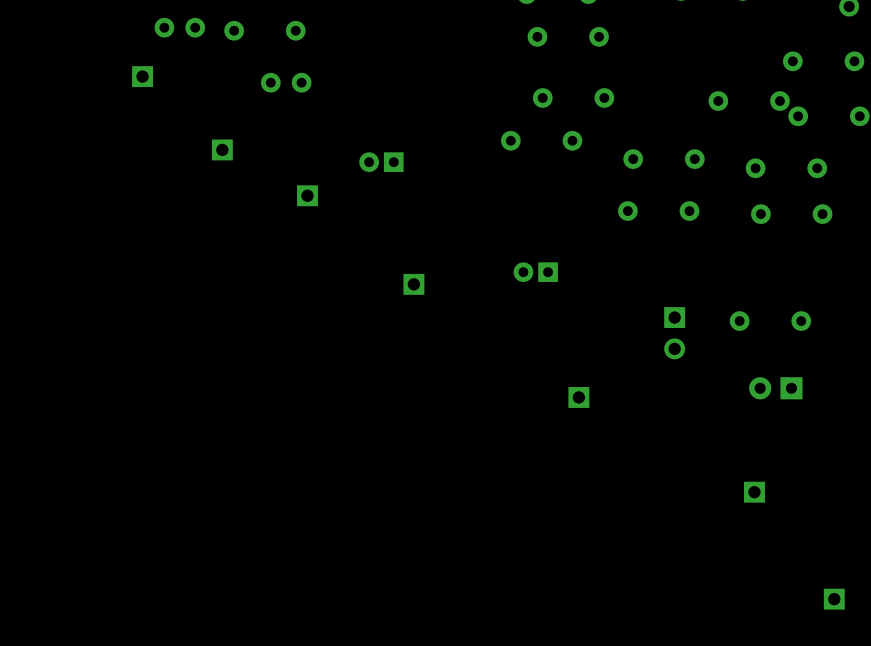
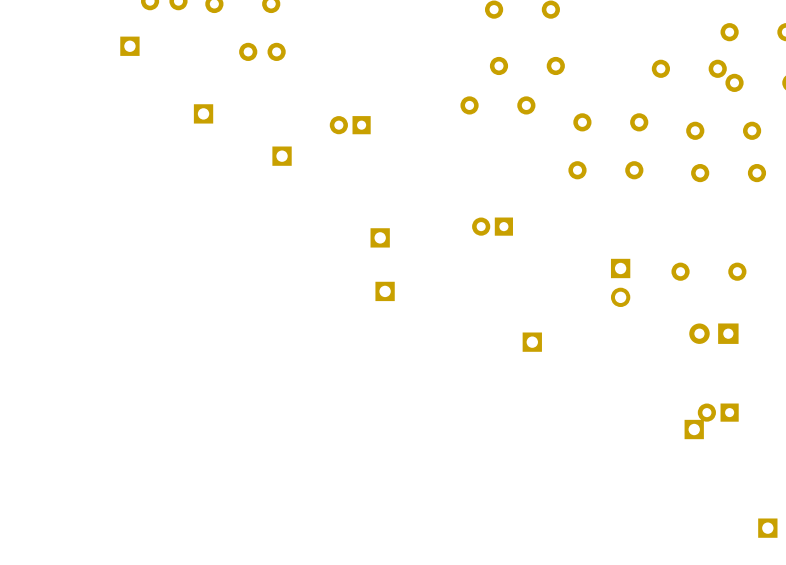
part: none -> (385, 291)
part: none -> (718, 412)

